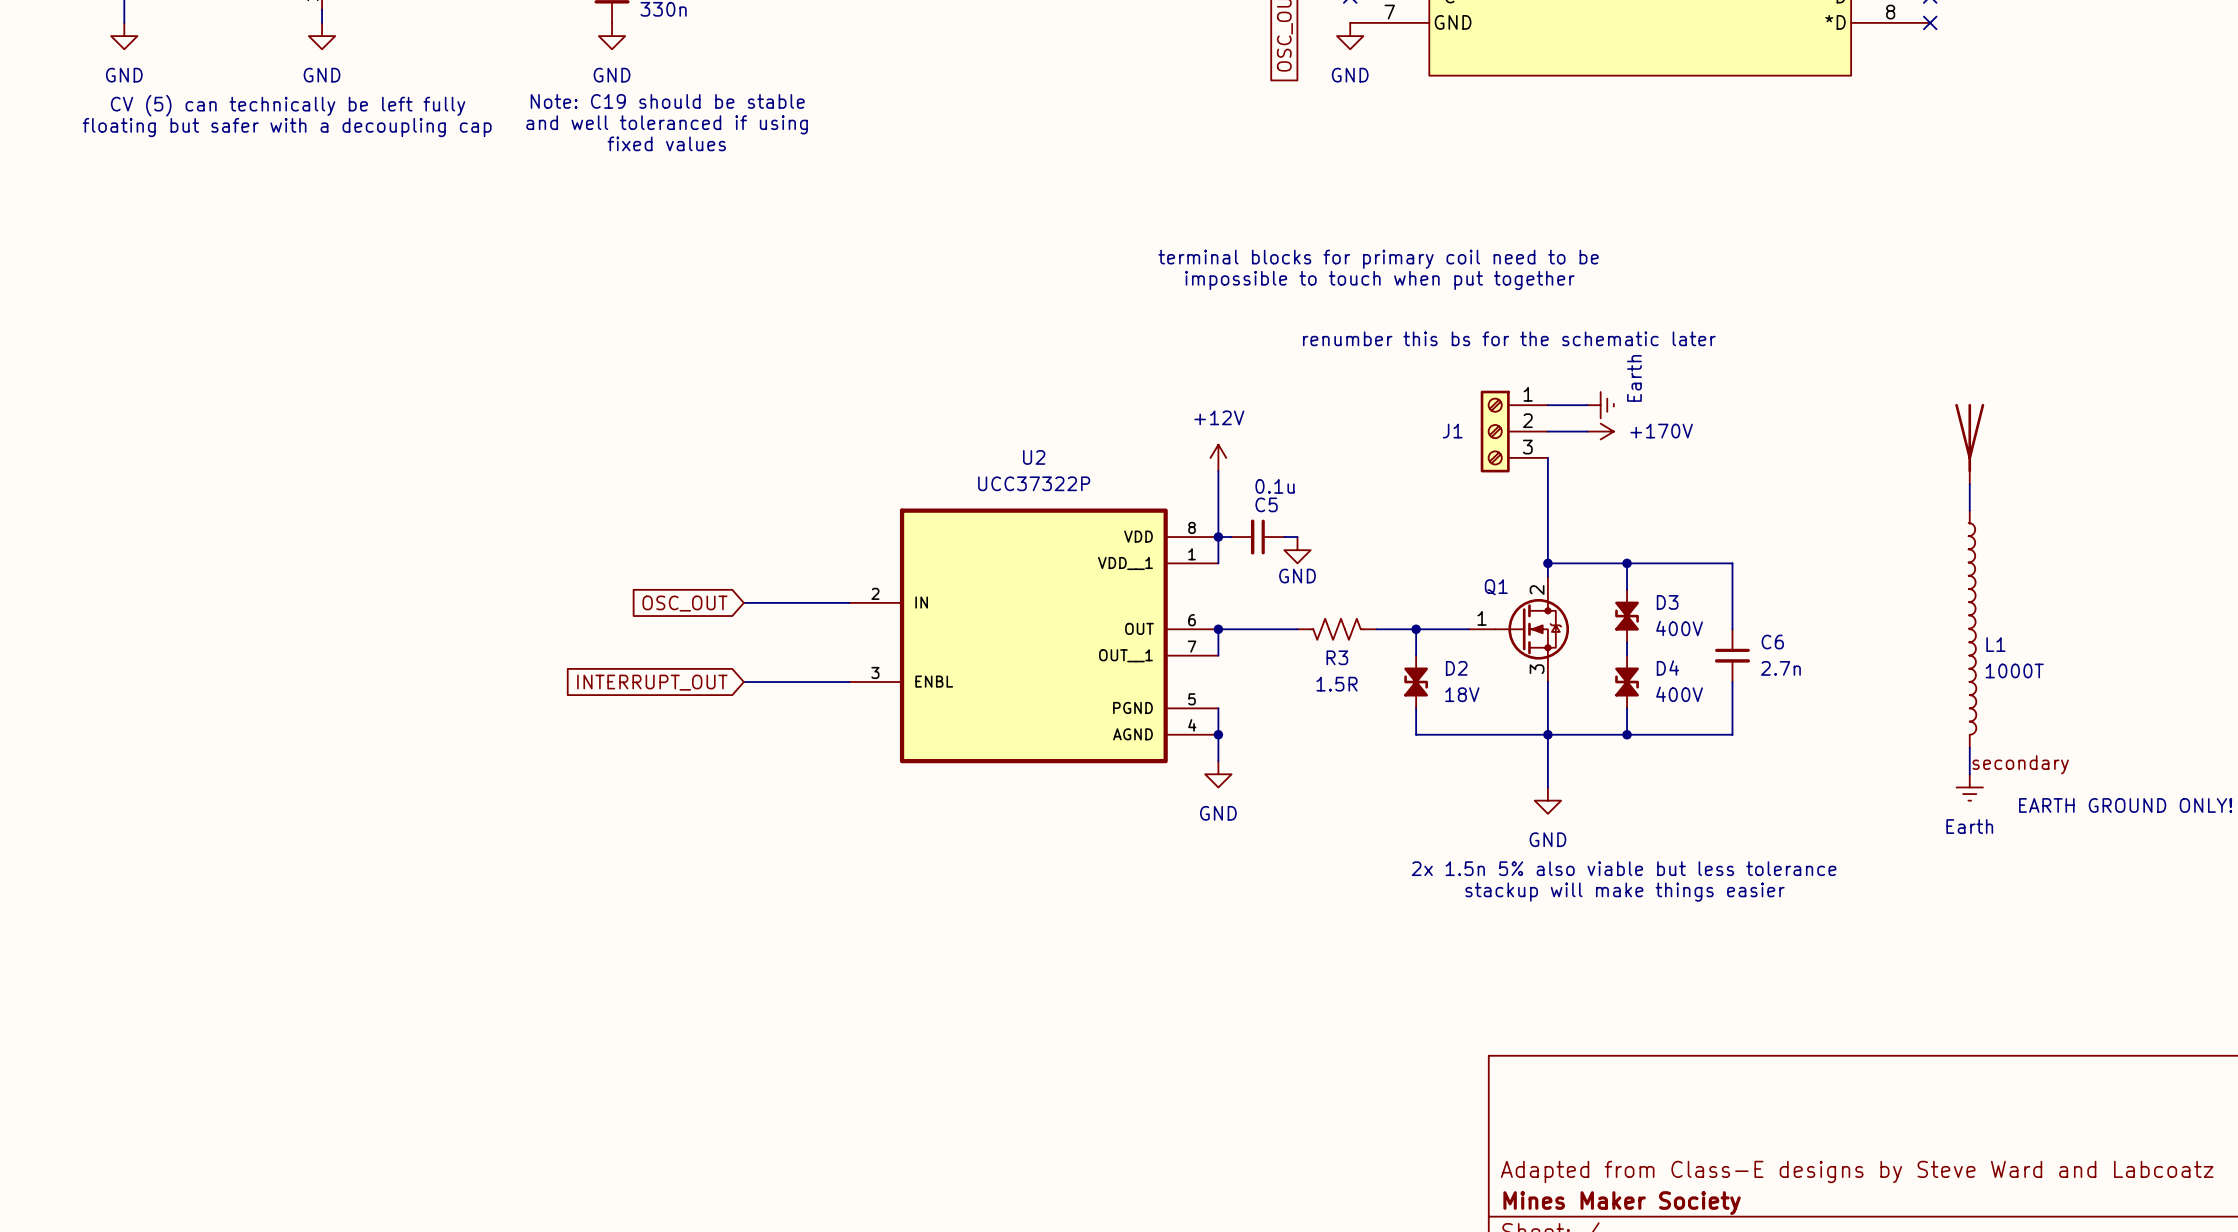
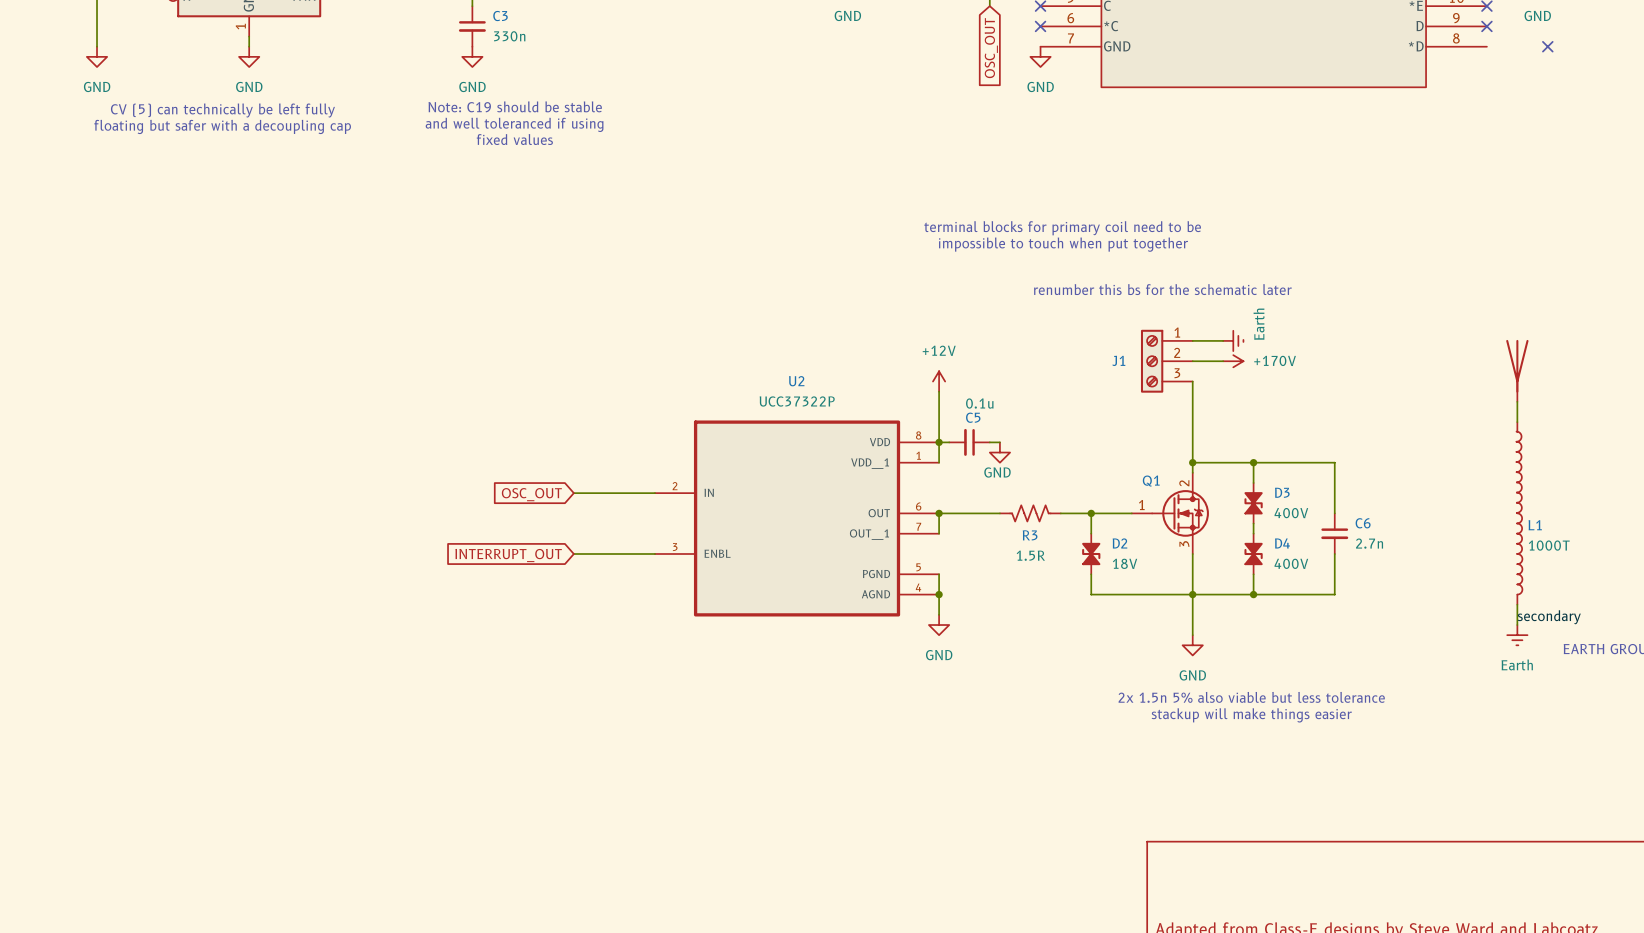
no-connect mark: (1930, 22) -> none
no-connect mark: none -> (1547, 46)

